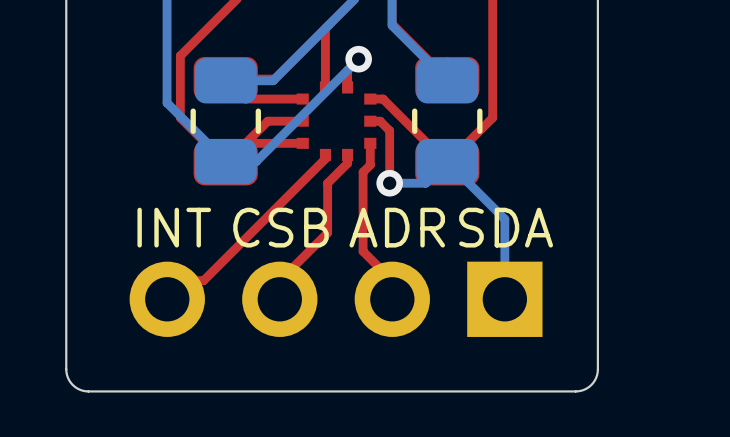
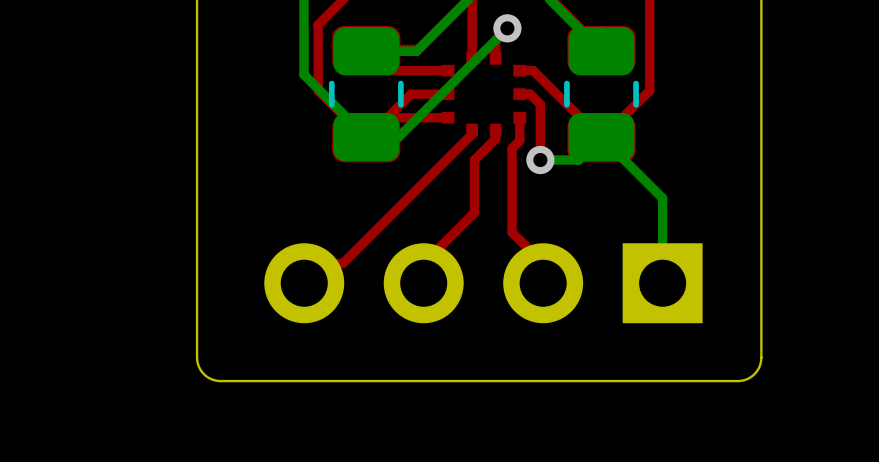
text: INT (174, 227) -> none
text: CSB (280, 227) -> none
text: ADR (397, 227) -> none
text: SDA (506, 227) -> none

